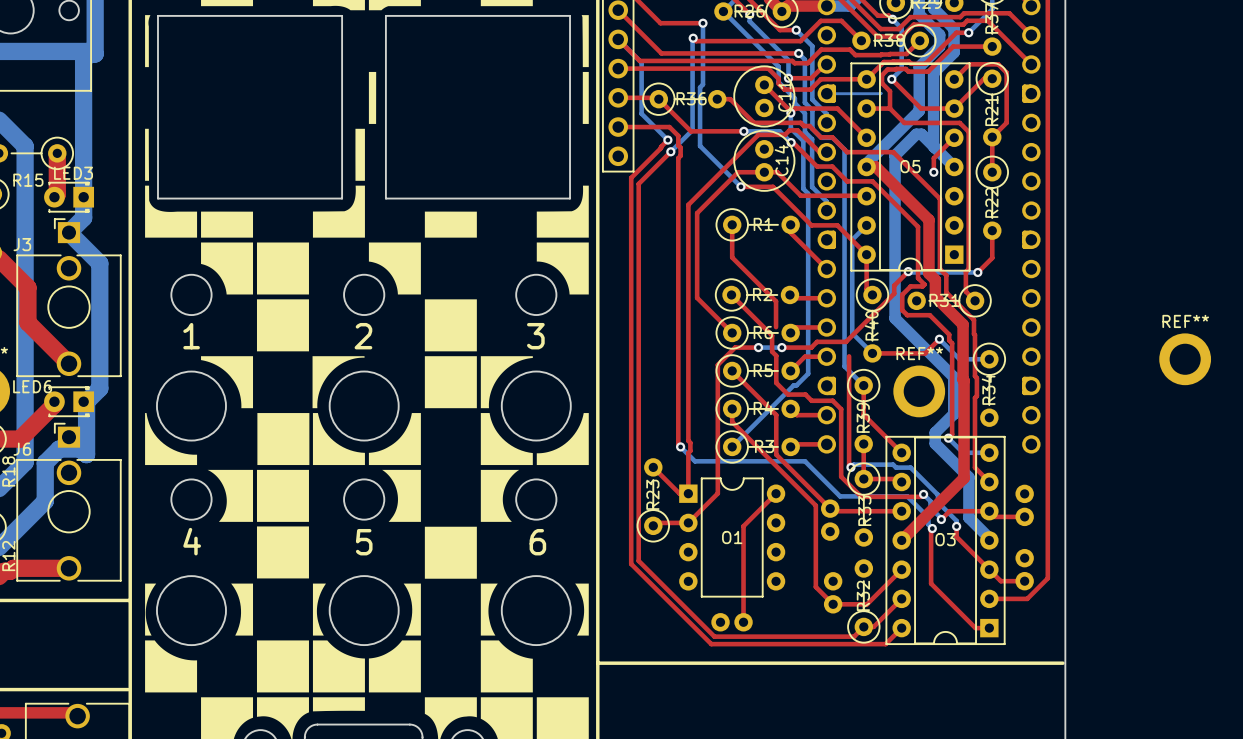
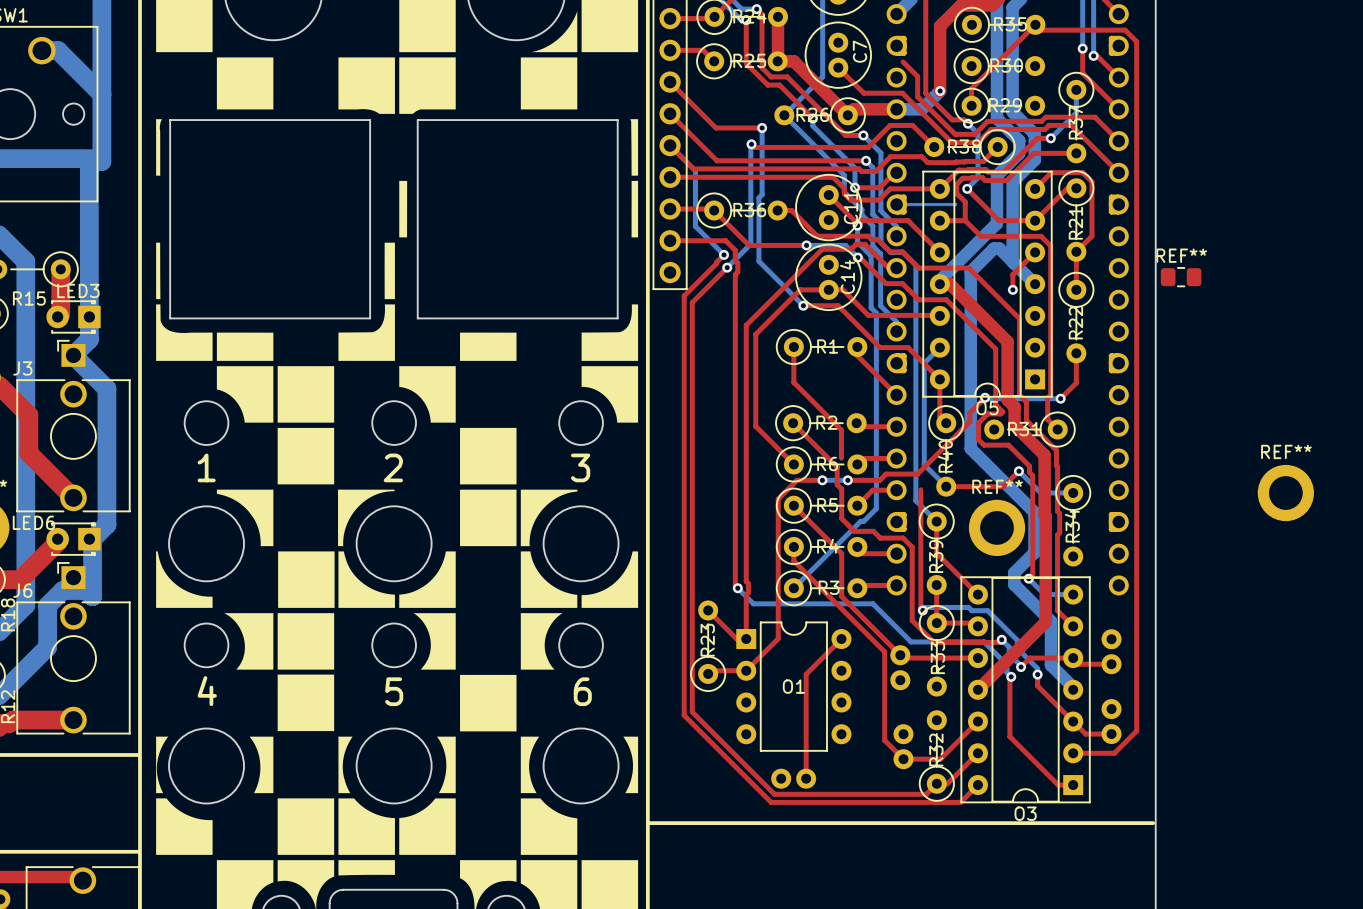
REF**: none -> (1181, 277)
O5 name position: O5 (910, 166) -> O5 (987, 408)
O3 name position: O3 (945, 539) -> O3 (1025, 813)

